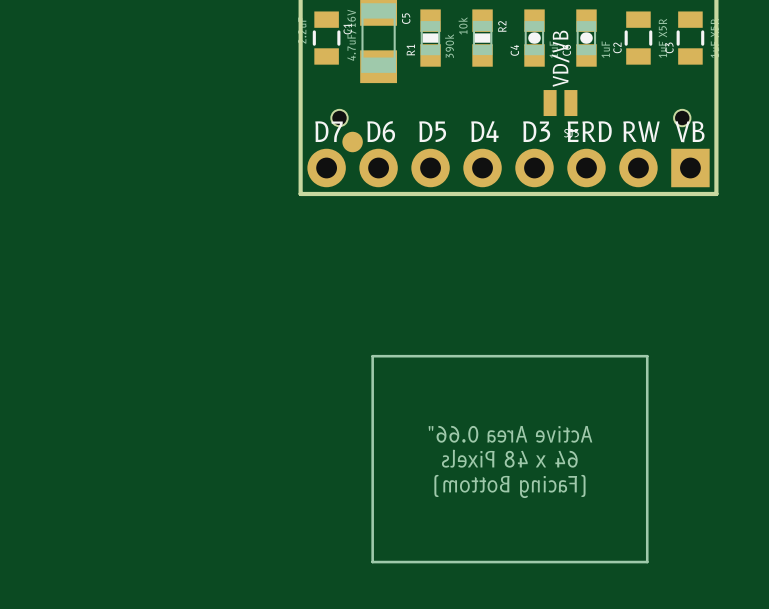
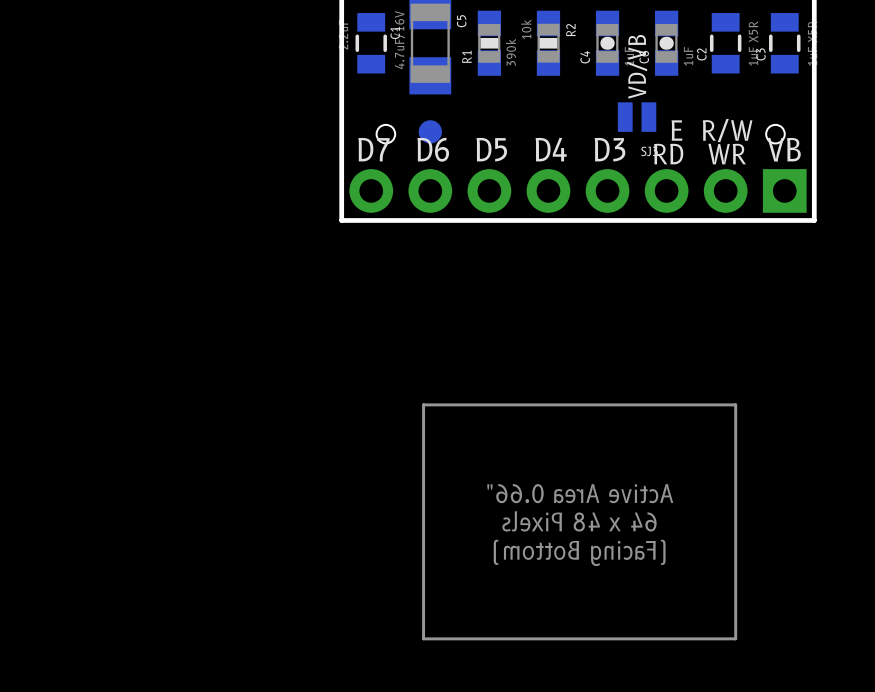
text: none -> E (676, 130)
text: none -> R/W (727, 130)
text: ERD (589, 131) -> RD (668, 154)
text: RW (641, 131) -> WR (727, 154)
part position: (352, 142) -> (430, 131)

